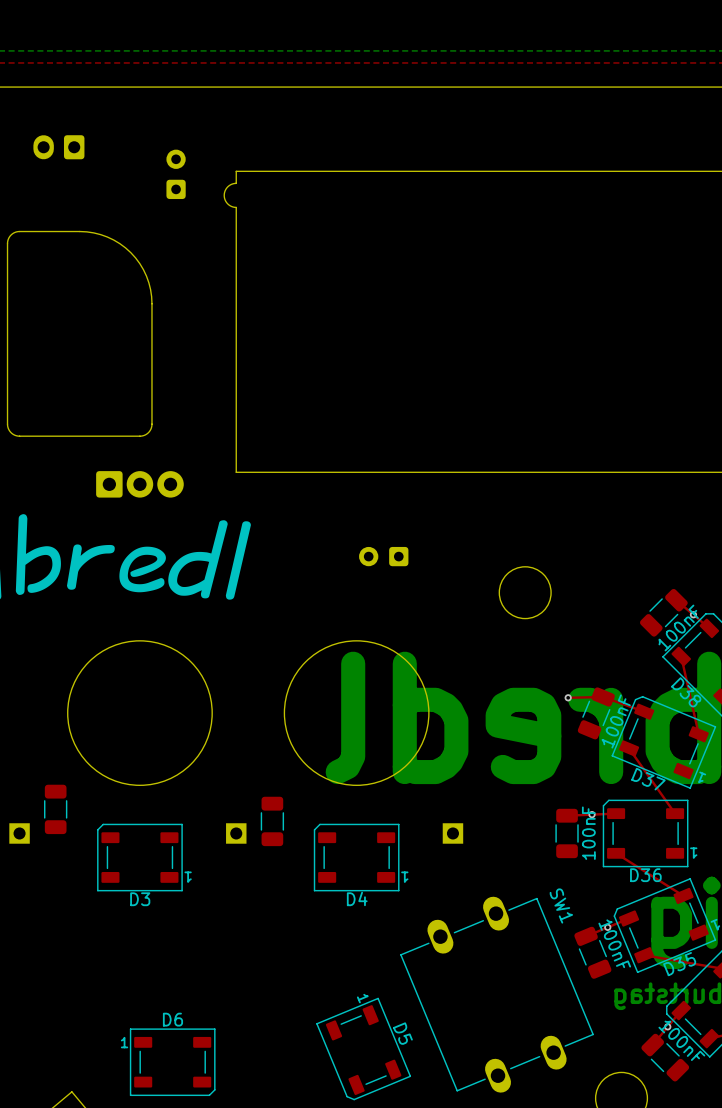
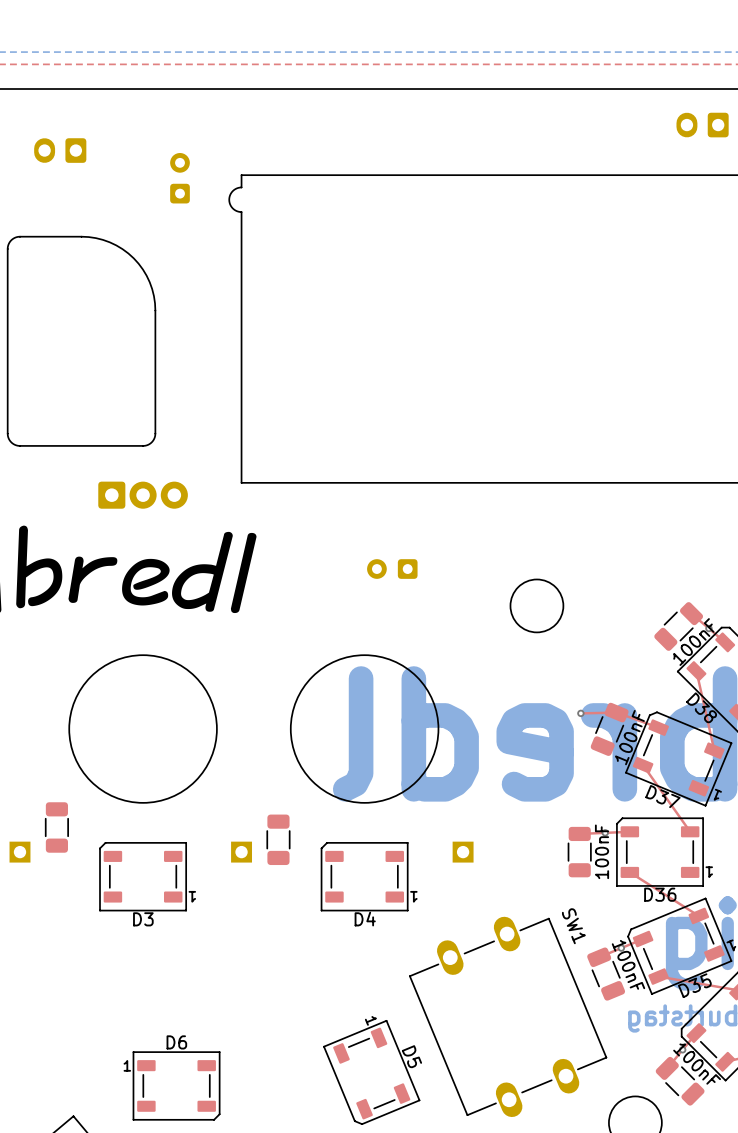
part: none -> (702, 125)

